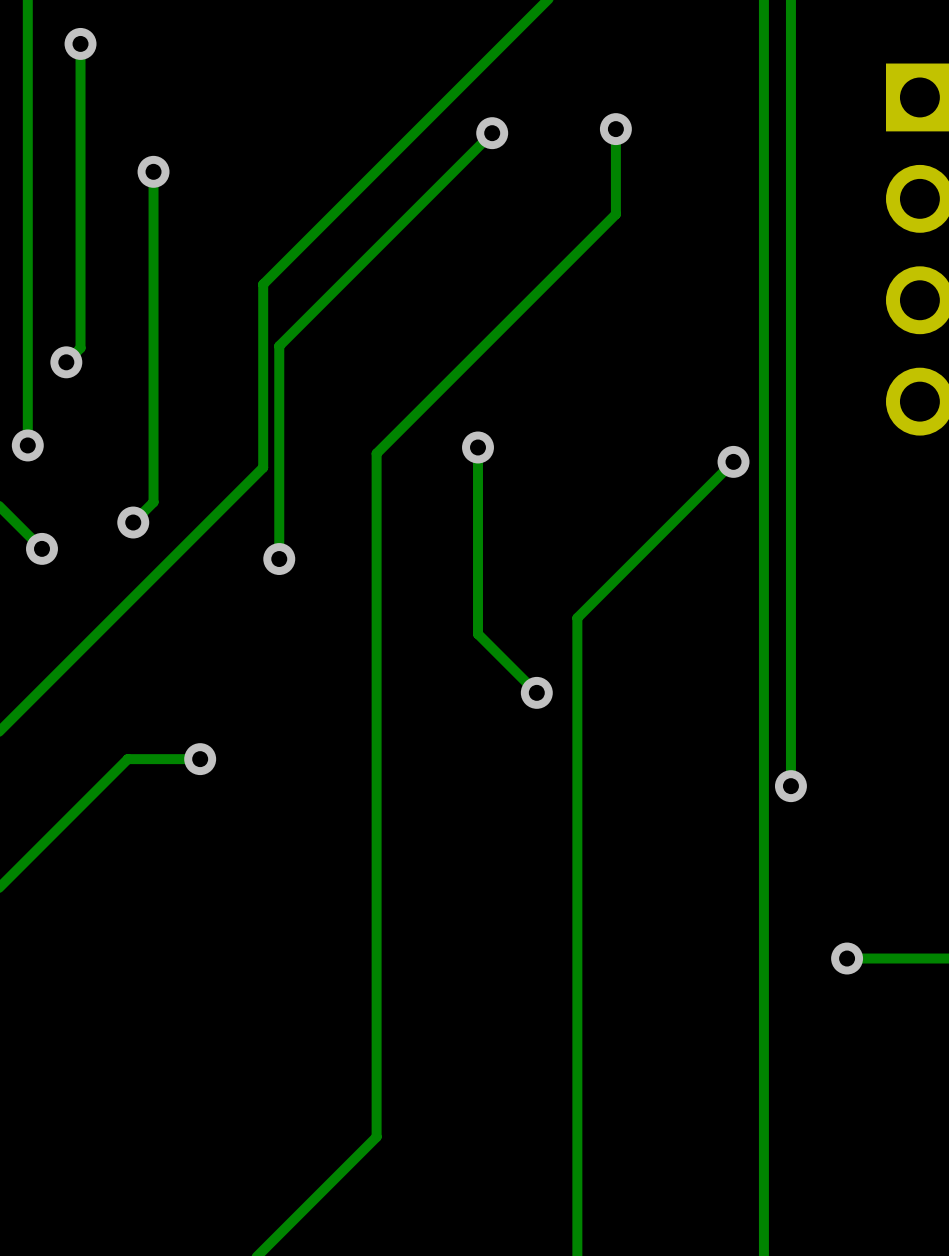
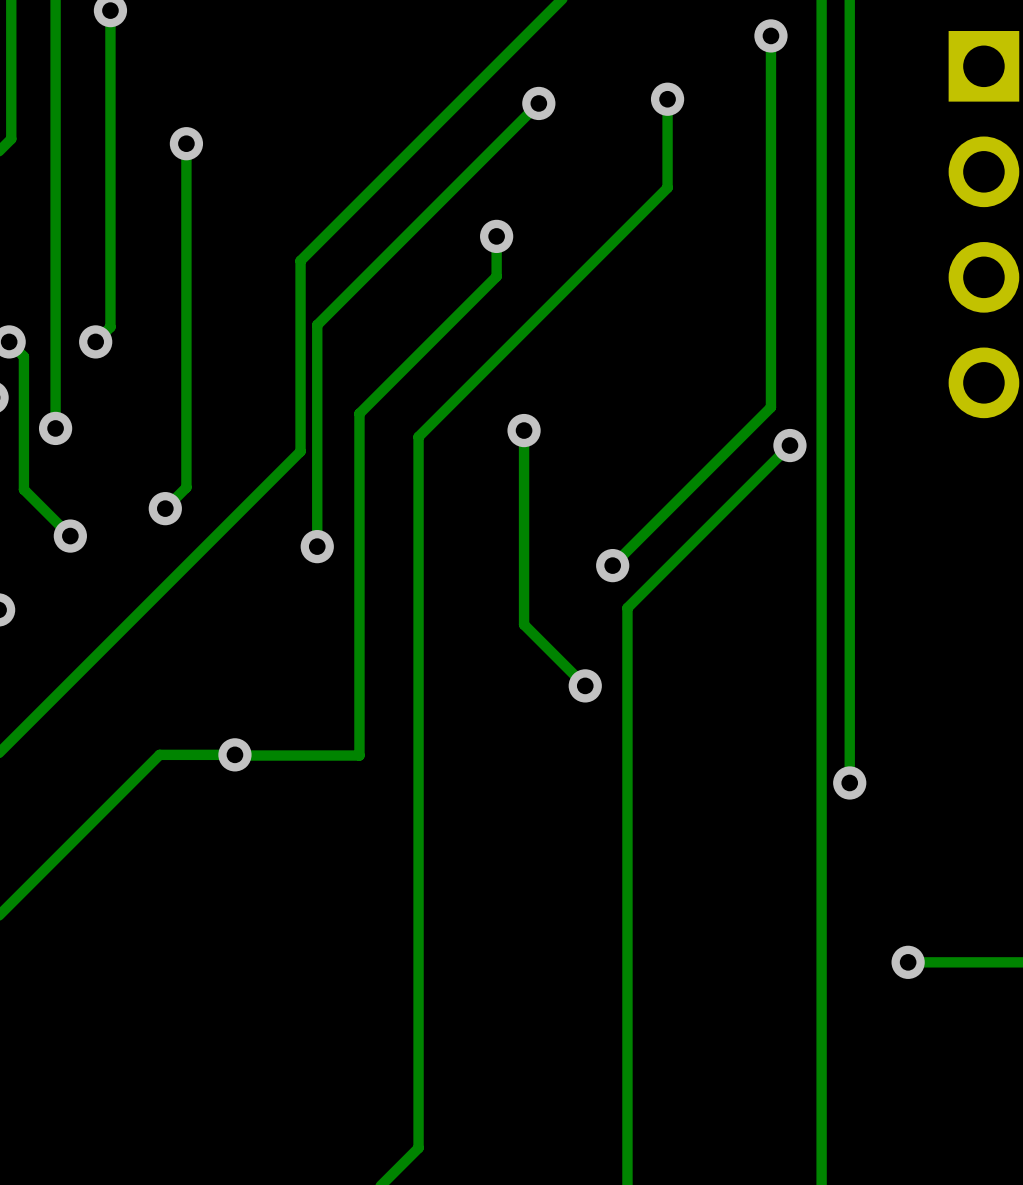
track: none -> (770, 35) (770, 407) (612, 565)
via: none -> (770, 35)
track: none -> (496, 236) (496, 276) (359, 413) (359, 755) (234, 754)
via: none -> (496, 236)
via: none -> (612, 565)

